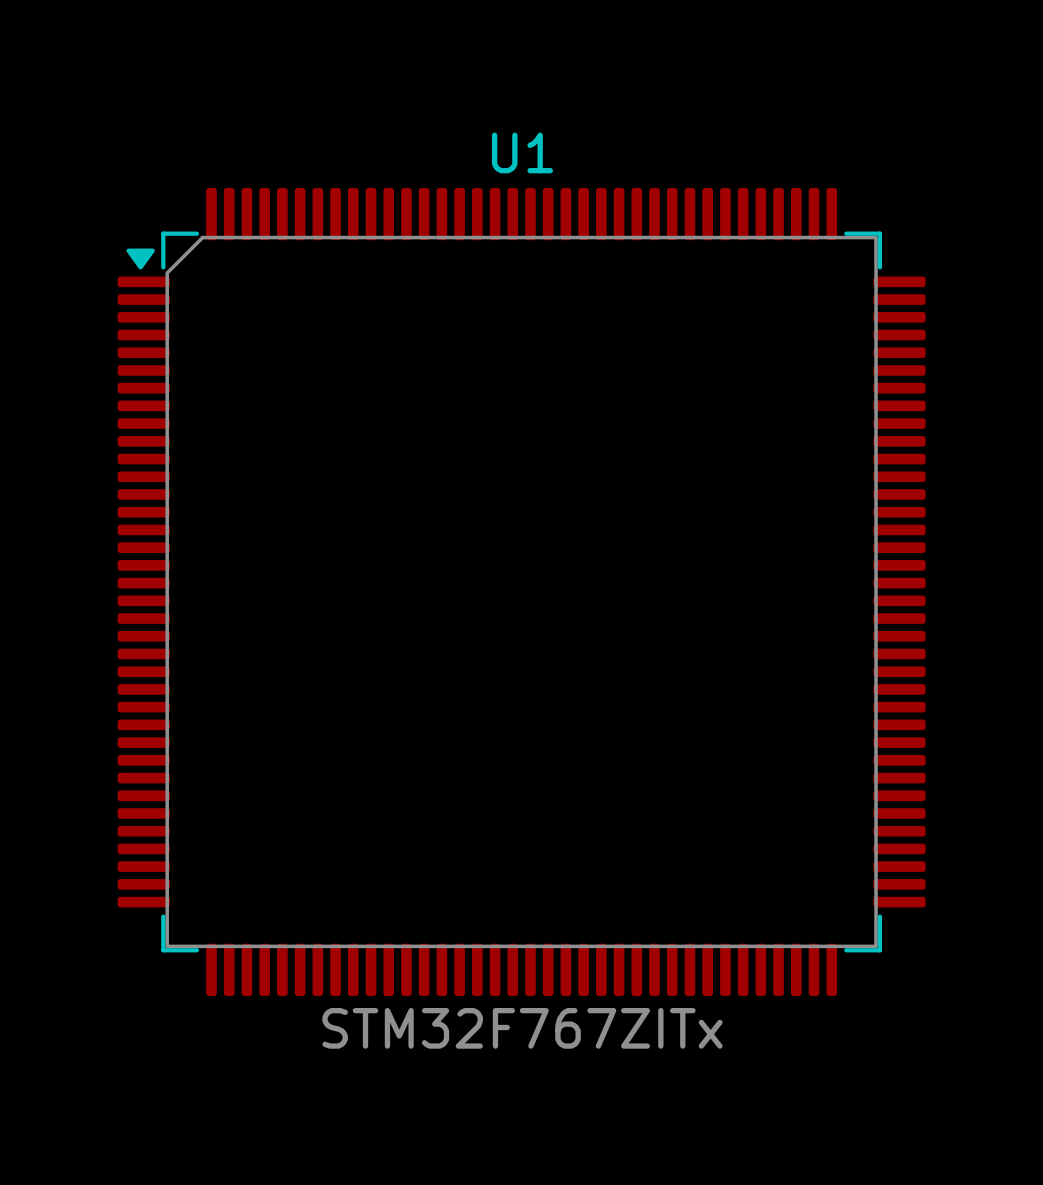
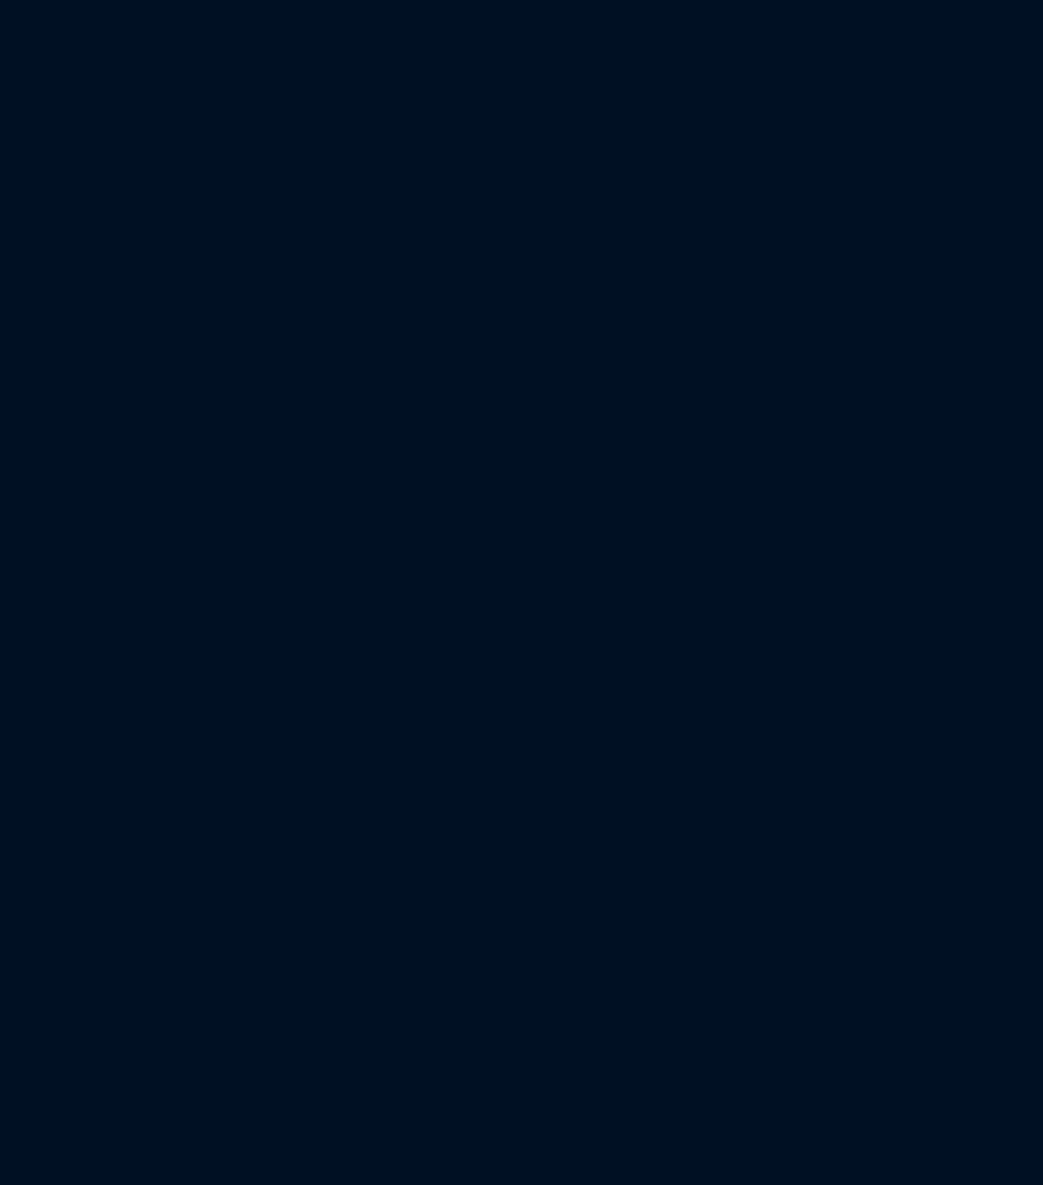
U1: STM32F767ZITx (521, 591) -> none

